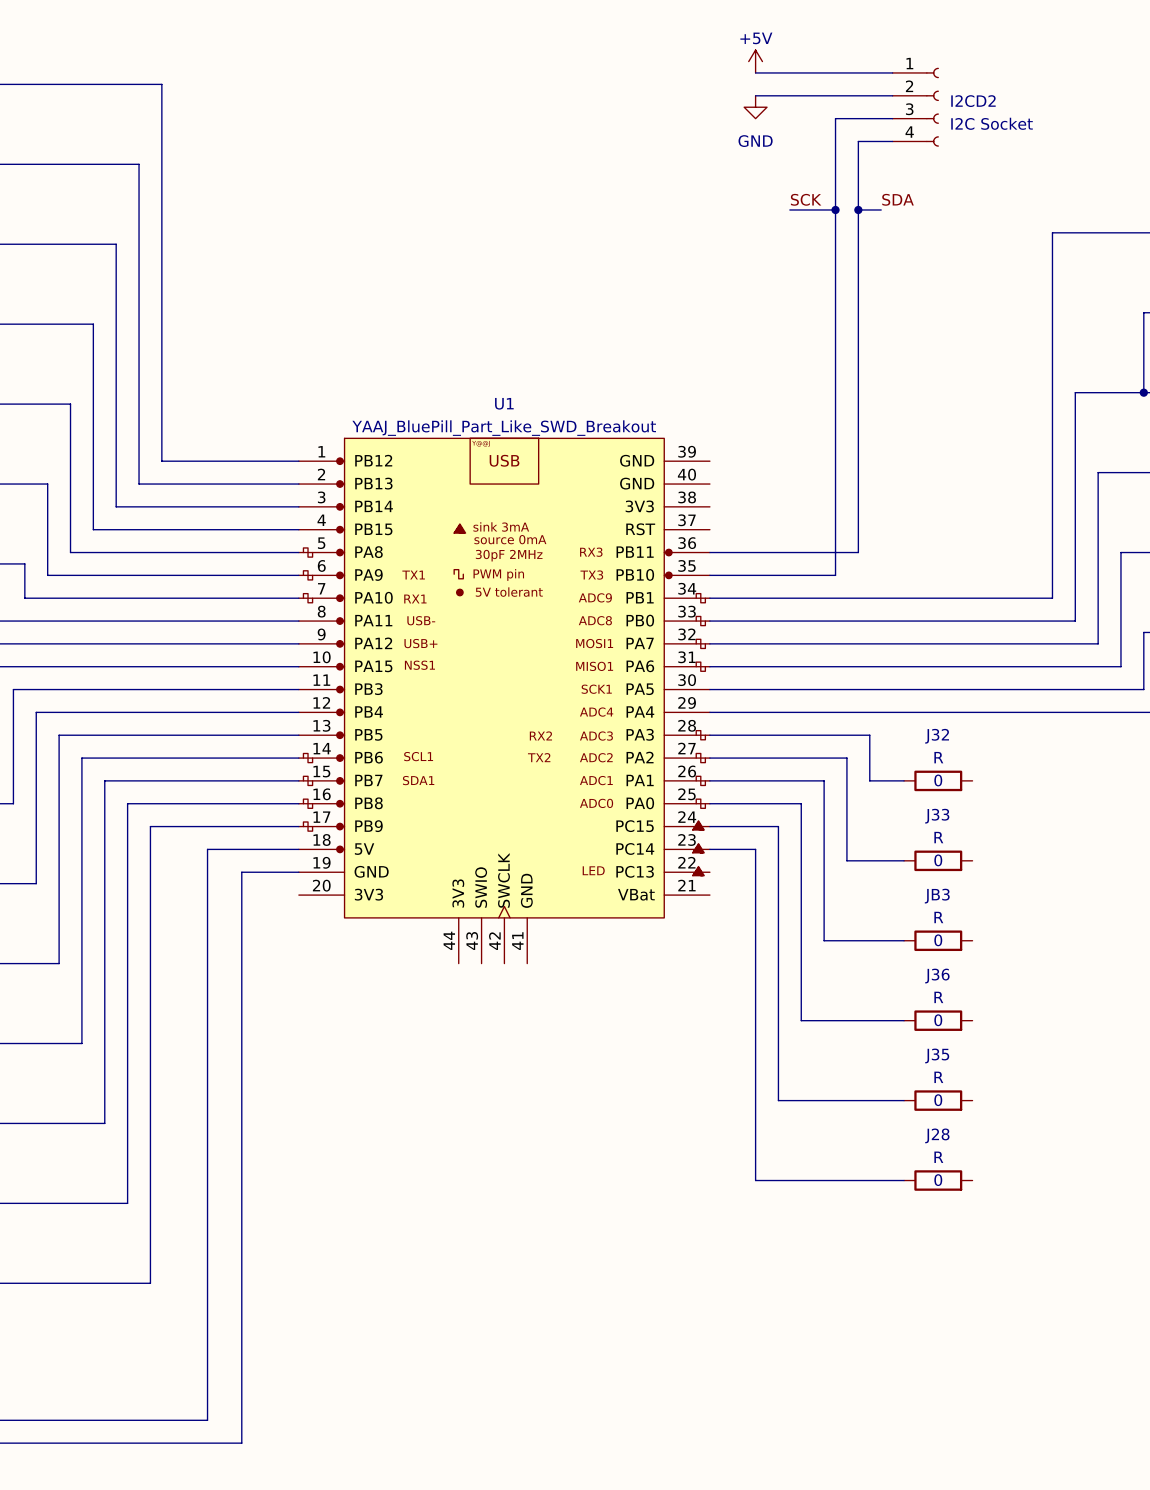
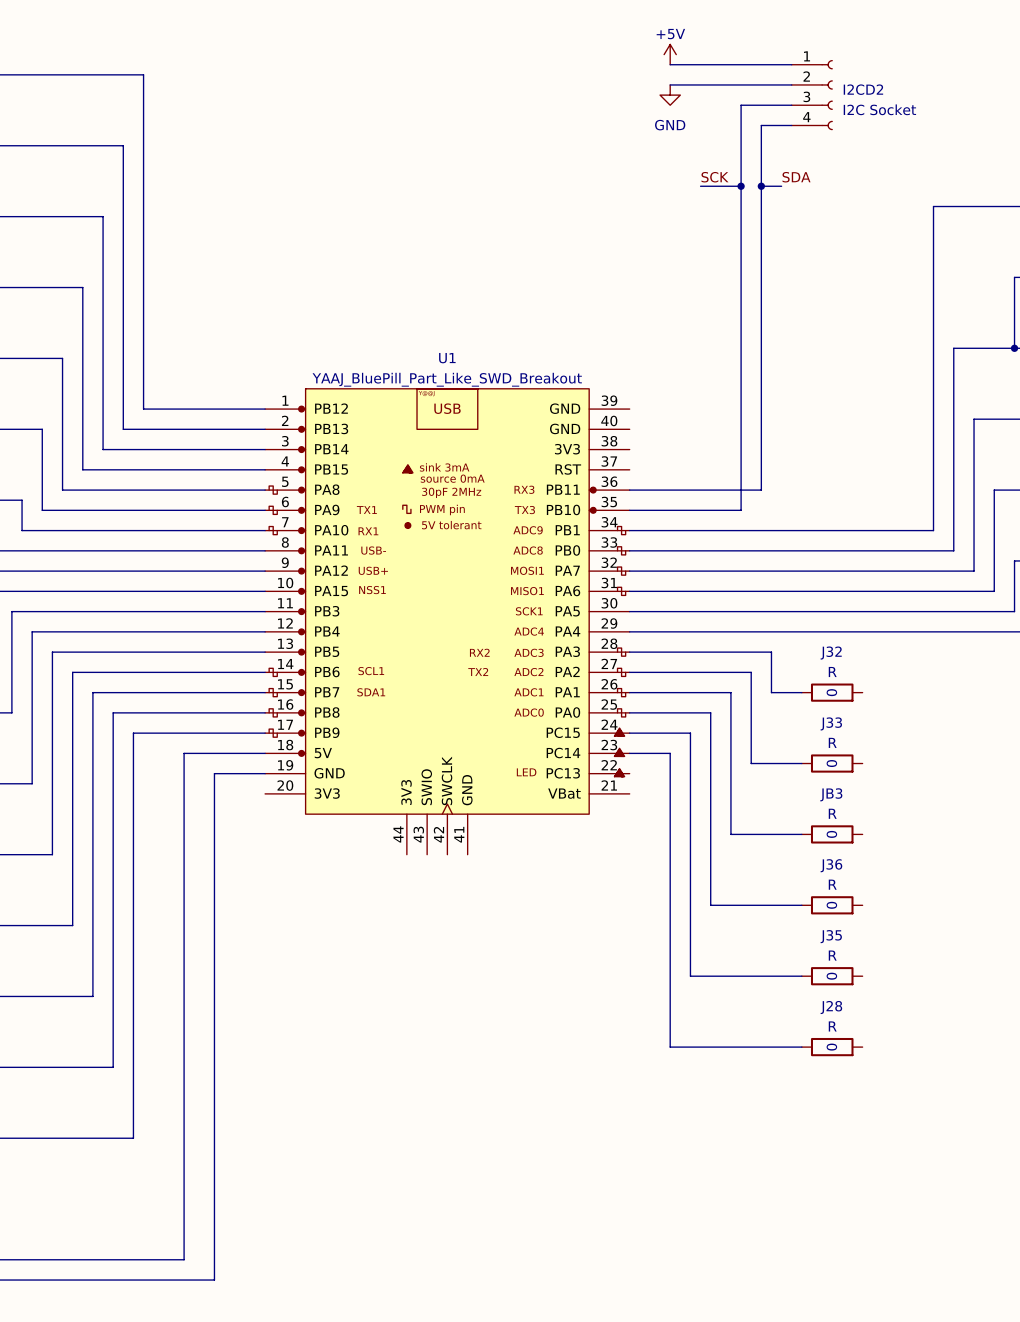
J32 text rotation: 0° (938, 780) -> 90° counterclockwise (831, 692)
J33 text rotation: 0° (938, 860) -> 90° counterclockwise (831, 763)
JB3 text rotation: 0° (938, 940) -> 90° counterclockwise (831, 834)
J36 text rotation: 0° (938, 1020) -> 90° counterclockwise (831, 905)
J35 text rotation: 0° (938, 1100) -> 90° counterclockwise (831, 976)
J28 text rotation: 0° (938, 1180) -> 90° counterclockwise (831, 1047)

